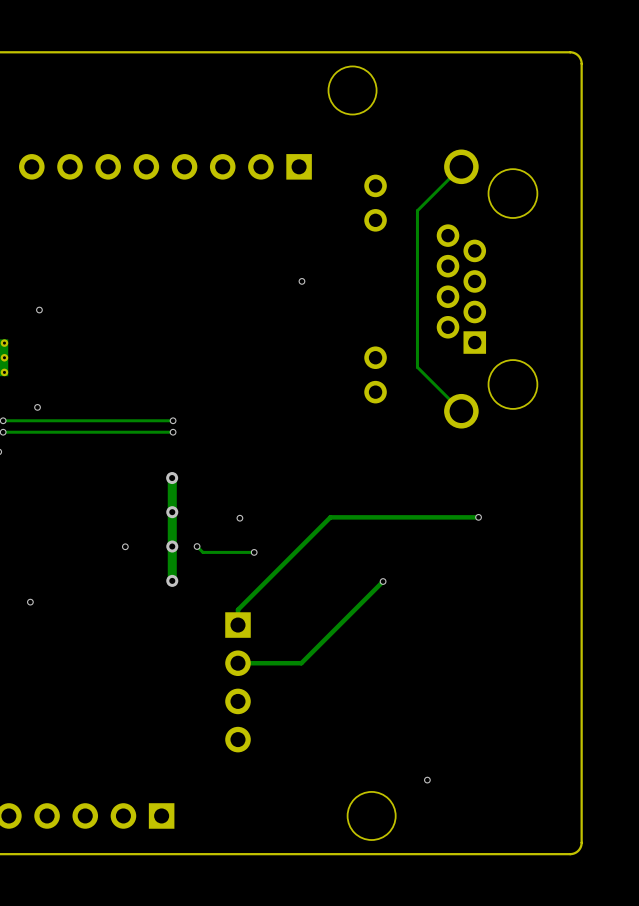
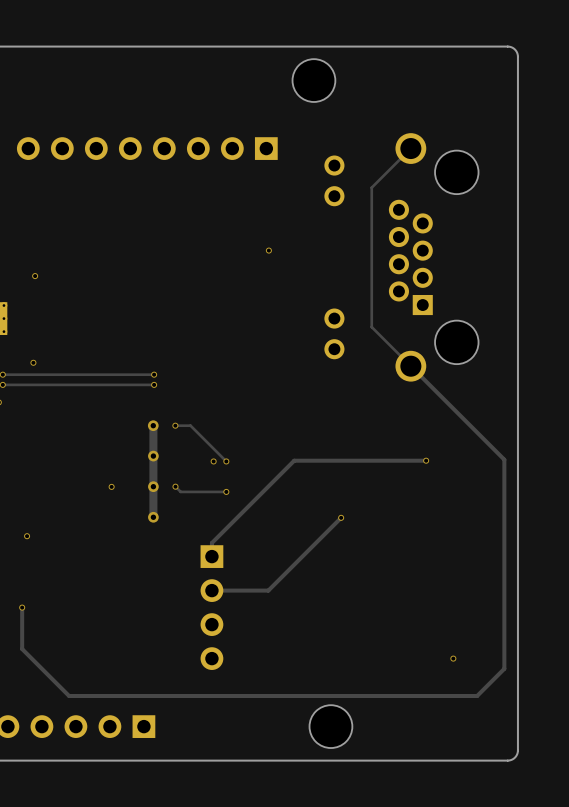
track: none -> (410, 366) (504, 459) (504, 668) (477, 696) (69, 696) (22, 649) (22, 607)
track: none -> (175, 425) (190, 425) (226, 461)
via: none -> (175, 425)
via: none -> (226, 461)
via: none -> (22, 607)
via: none -> (453, 658)
via: (427, 780) -> none

